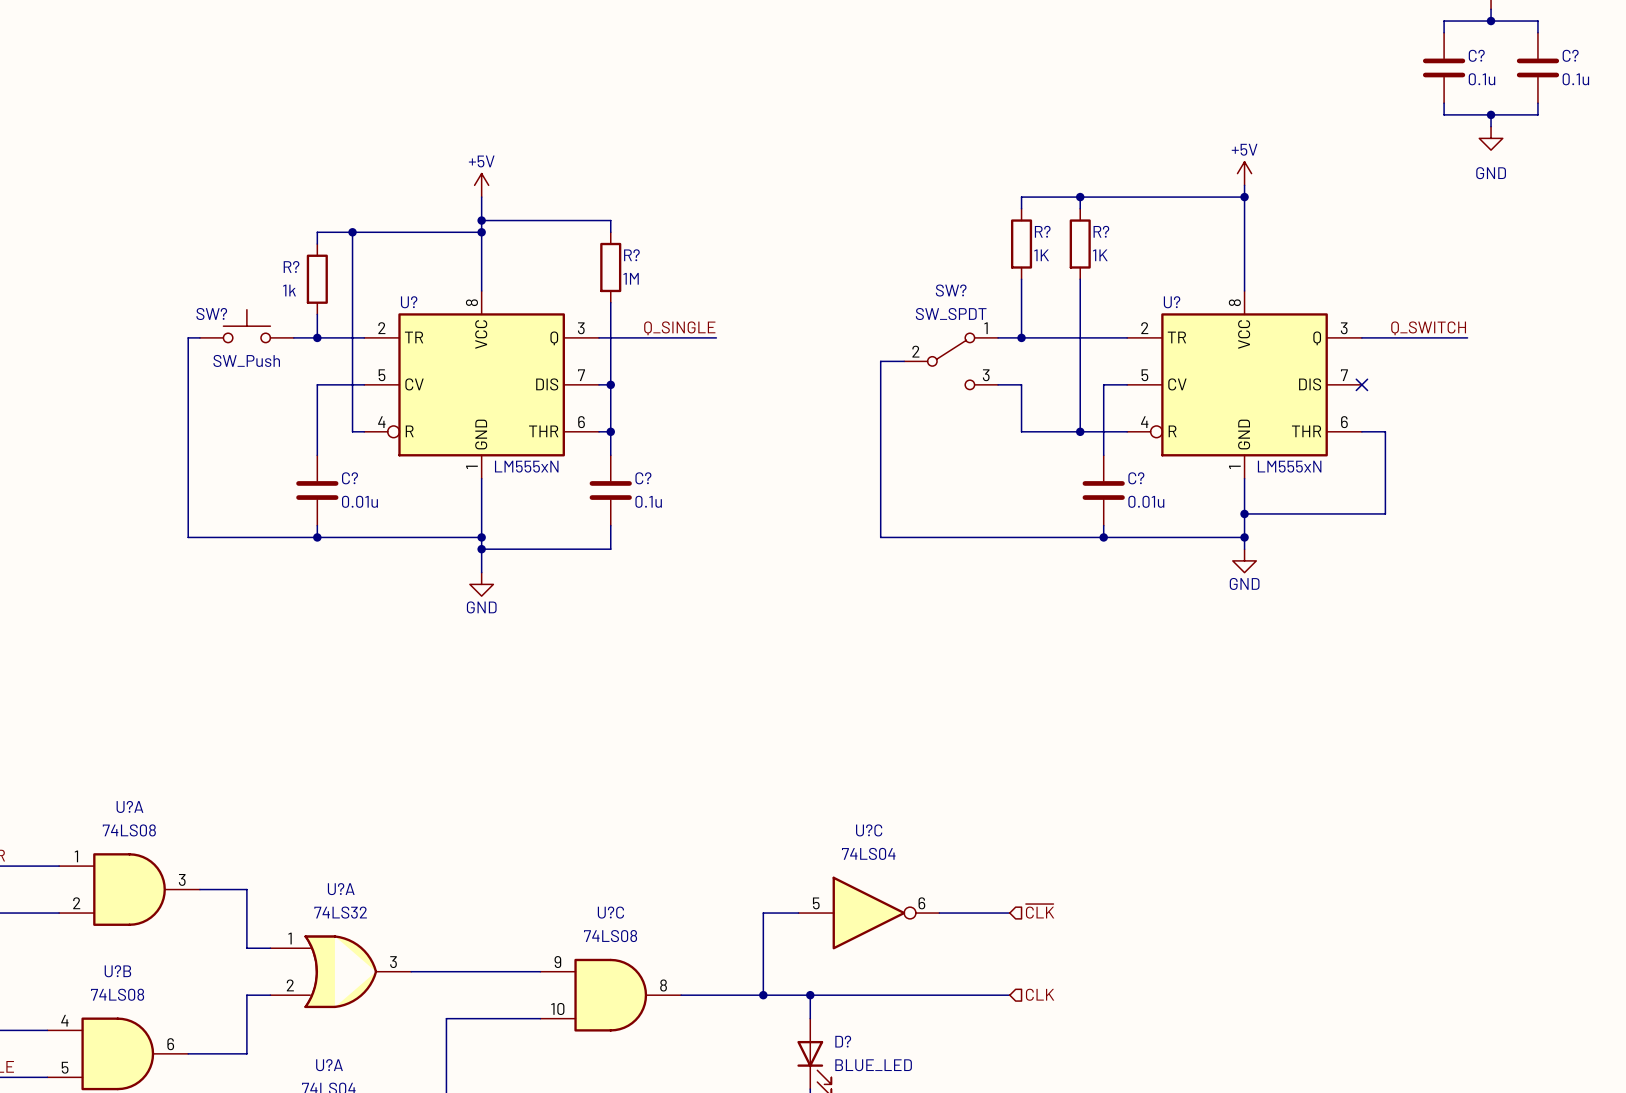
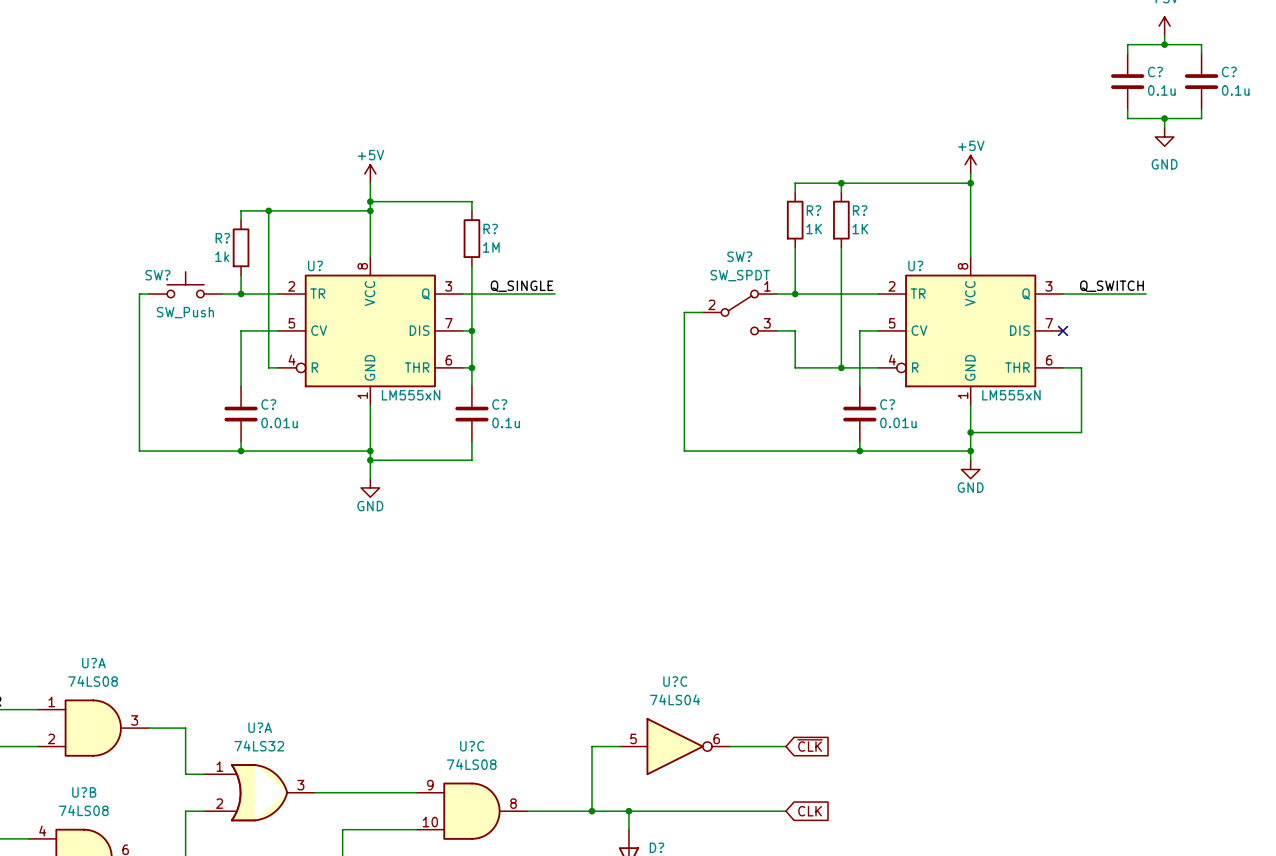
global label: none -> ~{CLK} (810, 745)
hierarchical label: ~{CLK} (1040, 911) -> none
hierarchical label: CLK (1040, 994) -> none
global label: none -> CLK (810, 811)

